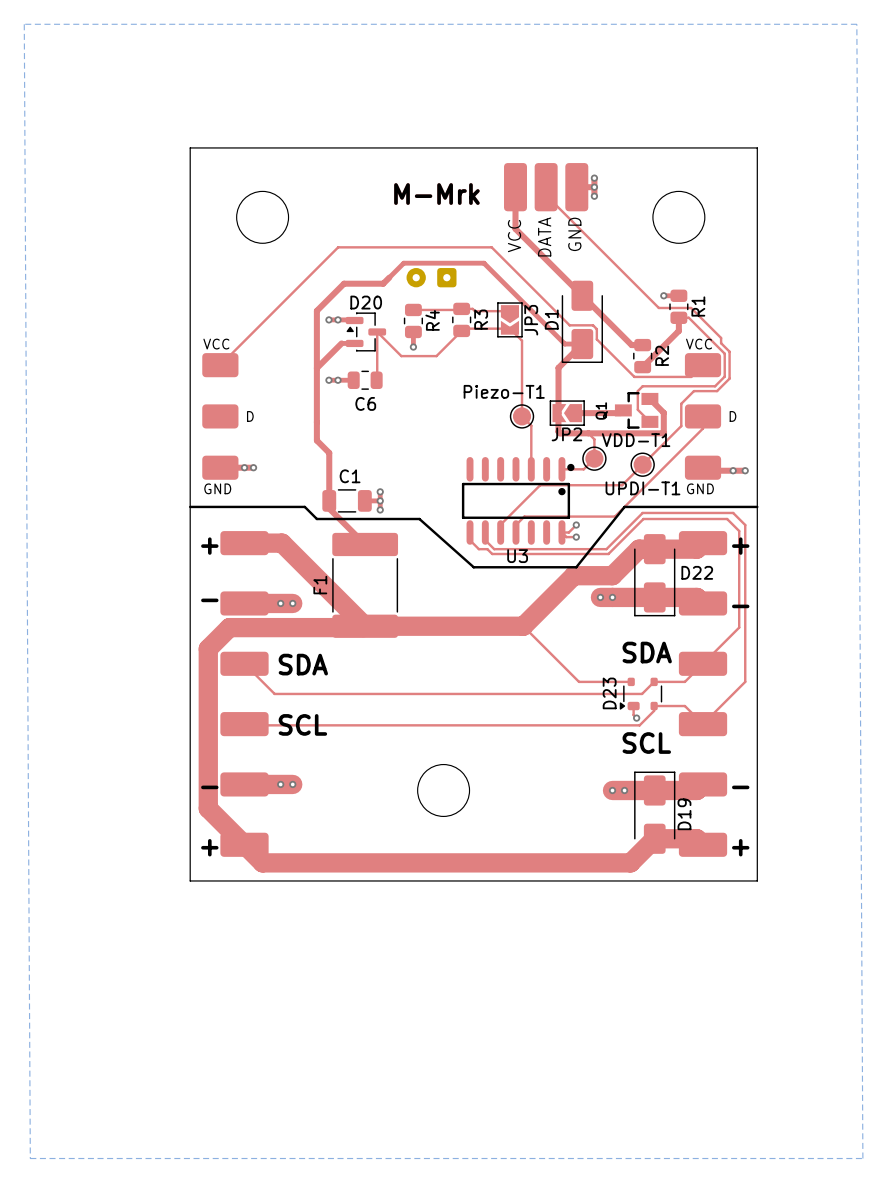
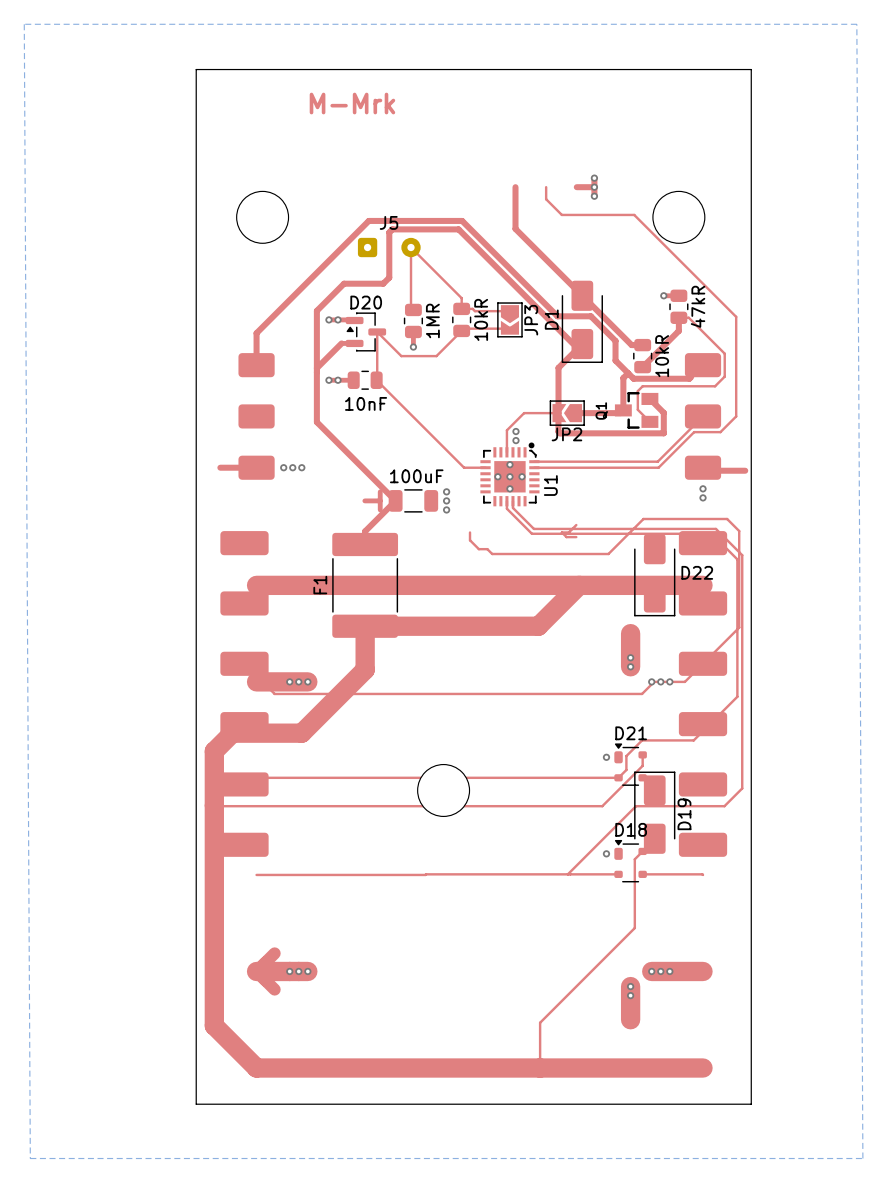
text: none -> M-Mrk (352, 103)
board edge: (190, 147) (757, 147) (757, 880) (190, 880) (190, 147) -> (196, 69) (196, 1104) (751, 1104) (751, 69) (196, 69)
part: (546, 187) -> none
text: M-Mrk (436, 194) -> none
top track: (546, 195) (658, 307) (691, 307) (721, 338) (721, 343) (729, 351) (729, 378) (717, 391) (693, 391) (681, 403) (681, 426) (622, 485) (540, 485) (500, 524) (500, 532) -> (546, 195) (546, 199) (561, 214) (634, 214) (736, 316) (736, 416) (720, 432) (694, 432) (658, 467) (534, 467)
J5: none -> (389, 247)
top track: (389, 277) (403, 263) (483, 263) (564, 344) (573, 344) -> (389, 277) (389, 232) (392, 229) (458, 229) (573, 344)
part: (431, 277) -> none
R1 name: R1 (698, 306) -> 47kR (698, 306)
top track: (461, 308) (413, 309) -> (461, 308) (461, 298) (411, 247) (411, 307) (413, 309)
R3 name: R3 (481, 319) -> 10kR (481, 319)
R4 name: R4 (432, 320) -> 1MR (432, 320)
top track: (509, 328) (522, 340) (522, 416) (531, 425) (531, 469) -> none
text: VCC (216, 344) -> none
text: VCC (699, 344) -> none
R2 name: R2 (662, 355) -> 10kR (662, 356)
top track: (220, 365) (338, 247) (491, 247) (569, 325) (593, 325) (596, 329) (596, 339) (634, 376) (691, 376) -> (256, 365) (256, 333) (368, 220) (462, 220) (557, 316) (590, 316) (615, 340) (615, 360) (633, 378) (689, 378) (691, 376)
top track: none -> (628, 373) (623, 378) (623, 410)
top track: none -> (376, 380) (464, 467) (485, 467)
C6 name: C6 (365, 403) -> 10nF (366, 403)
top track: none -> (558, 413) (524, 413) (506, 430) (506, 452)
part position: (220, 416) -> (256, 416)
text: D (250, 416) -> none
Piezo-T1: (522, 416) -> none
top track: (703, 416) (703, 428) (614, 516) (524, 516) (515, 525) (515, 532) -> (703, 416) (657, 461) (534, 461)
text: D (732, 416) -> none
top track: (316, 422) (316, 440) (329, 452) (329, 508) (365, 544) -> (316, 422) (395, 500) (365, 531) (365, 544)
via: none -> (515, 431)
top track: (588, 433) (594, 439) (594, 458) (583, 469) (561, 469) -> none
via: none -> (515, 440)
VDD-T1: (594, 458) -> none
via: none -> (509, 464)
UPDI-T1: (642, 464) -> none
via: (244, 467) -> none
via: (253, 467) -> none
via: none -> (283, 467)
via: none -> (292, 467)
via: none -> (301, 467)
via: (733, 470) -> none
via: (745, 470) -> none
U1: none -> (509, 474)
via: none -> (497, 476)
via: none -> (509, 476)
via: none -> (522, 476)
text: GND (217, 488) -> none
via: none -> (509, 488)
text: GND (700, 488) -> none
via: none -> (703, 488)
via: (380, 491) -> none
via: none -> (446, 491)
via: none -> (703, 497)
C1: (347, 500) -> none
via: (380, 500) -> none
100uF: none -> (413, 500)
via: none -> (446, 500)
U3: (518, 500) -> none
top track: none -> (506, 501) (506, 508) (531, 533) (711, 533) (737, 559) (737, 696) (693, 740) (642, 740) (626, 756) (626, 769) (618, 777) (256, 778)
top track: none -> (512, 501) (512, 507) (533, 528) (715, 528) (742, 555) (742, 788) (724, 806) (636, 806) (567, 874)
line: (190, 506) (304, 506) (316, 519) (419, 519) (473, 567) (576, 567) (624, 506) (757, 506) -> none
via: (380, 509) -> none
via: none -> (446, 509)
via: (576, 525) -> none
top track: (485, 532) (485, 540) (494, 549) (606, 549) (642, 512) (733, 512) (745, 525) (745, 681) (703, 724) (684, 706) (654, 706) (654, 710) (639, 725) (244, 724) -> none
via: (576, 537) -> none
top track: (244, 543) (282, 543) (365, 626) (229, 627) (208, 648) (208, 808) (262, 862) (630, 862) (654, 838) (696, 838) (703, 844) -> none
top track: (703, 543) (696, 549) (639, 549) (612, 575) (573, 575) (523, 626) (579, 681) (631, 681) -> none
text: + (209, 546) -> none
text: + (740, 546) -> none
top track: none -> (256, 585) (703, 585)
top track: none -> (579, 585) (538, 626) (523, 626)
top track: (600, 597) (696, 597) (703, 603) -> none
via: (600, 597) -> none
via: (612, 597) -> none
text: - (209, 600) -> none
top track: (244, 603) (292, 603) -> none
via: (280, 603) -> none
via: (292, 603) -> none
text: - (740, 606) -> none
top track: none -> (365, 626) (365, 669) (301, 733) (232, 733) (214, 751) (214, 1025) (256, 1068) (703, 1068)
top track: none -> (630, 633) (630, 666)
text: SDA (647, 652) -> none
via: none -> (630, 657)
text: SDA (303, 664) -> none
via: none -> (630, 666)
top track: none -> (256, 681) (307, 681)
via: none -> (289, 681)
via: none -> (298, 681)
via: none -> (307, 681)
via: none -> (651, 681)
via: none -> (660, 681)
via: none -> (669, 681)
D23: (640, 693) -> none
top track: (633, 706) (633, 715) (636, 718) -> none
via: (636, 718) -> none
text: SCL (302, 724) -> none
text: SCL (646, 743) -> none
top track: none -> (642, 754) (642, 765) (602, 806) (214, 805)
via: none -> (606, 757)
D21: none -> (630, 764)
top track: (244, 784) (292, 784) -> none
via: (280, 784) -> none
via: (292, 784) -> none
top track: (703, 784) (696, 790) (612, 790) -> none
text: - (209, 787) -> none
text: - (740, 787) -> none
via: (612, 790) -> none
via: (624, 790) -> none
text: + (209, 847) -> none
text: + (740, 847) -> none
top track: none -> (642, 851) (634, 859) (634, 928) (540, 1022) (540, 1068)
via: none -> (606, 853)
D18: none -> (630, 861)
top track: none -> (618, 874) (256, 874)
top track: none -> (642, 874) (703, 874)
top track: none -> (274, 953) (256, 971)
top track: none -> (256, 971) (307, 971)
top track: none -> (256, 971) (274, 989)
via: none -> (289, 971)
via: none -> (298, 971)
via: none -> (307, 971)
top track: none -> (651, 971) (703, 971)
via: none -> (651, 971)
via: none -> (660, 971)
via: none -> (669, 971)
top track: none -> (630, 986) (630, 1019)
via: none -> (630, 986)
via: none -> (630, 995)

